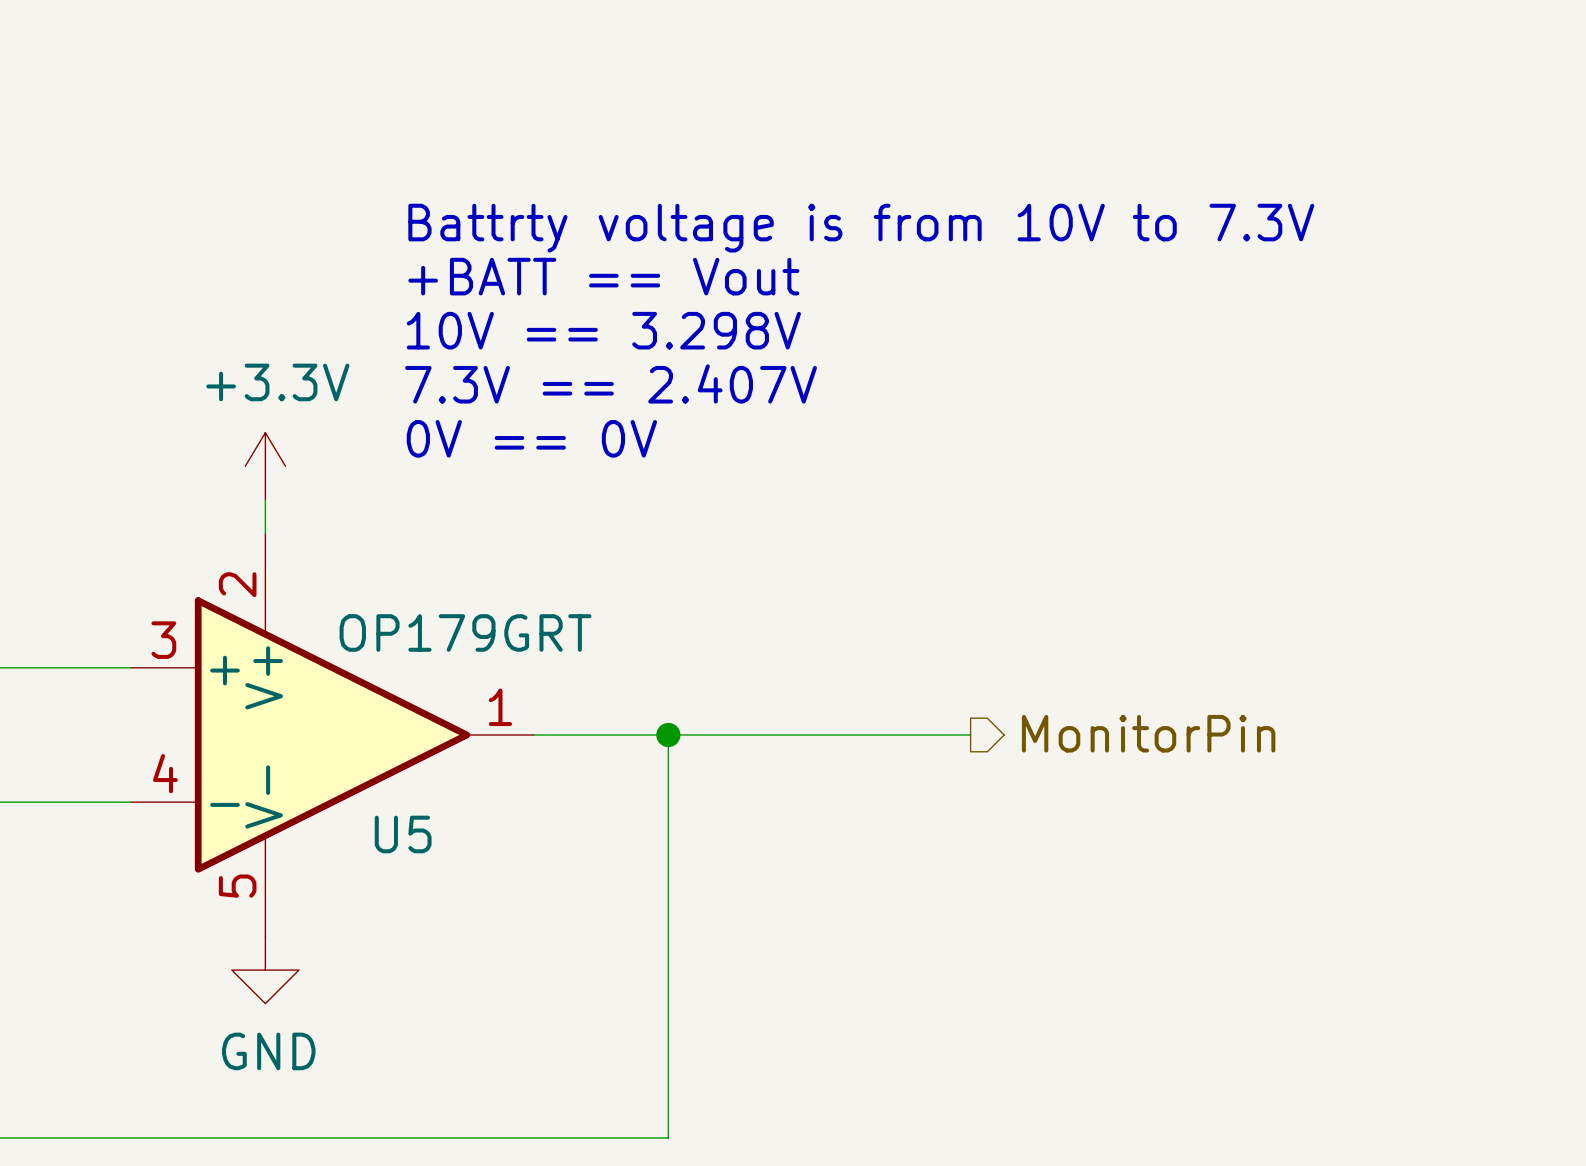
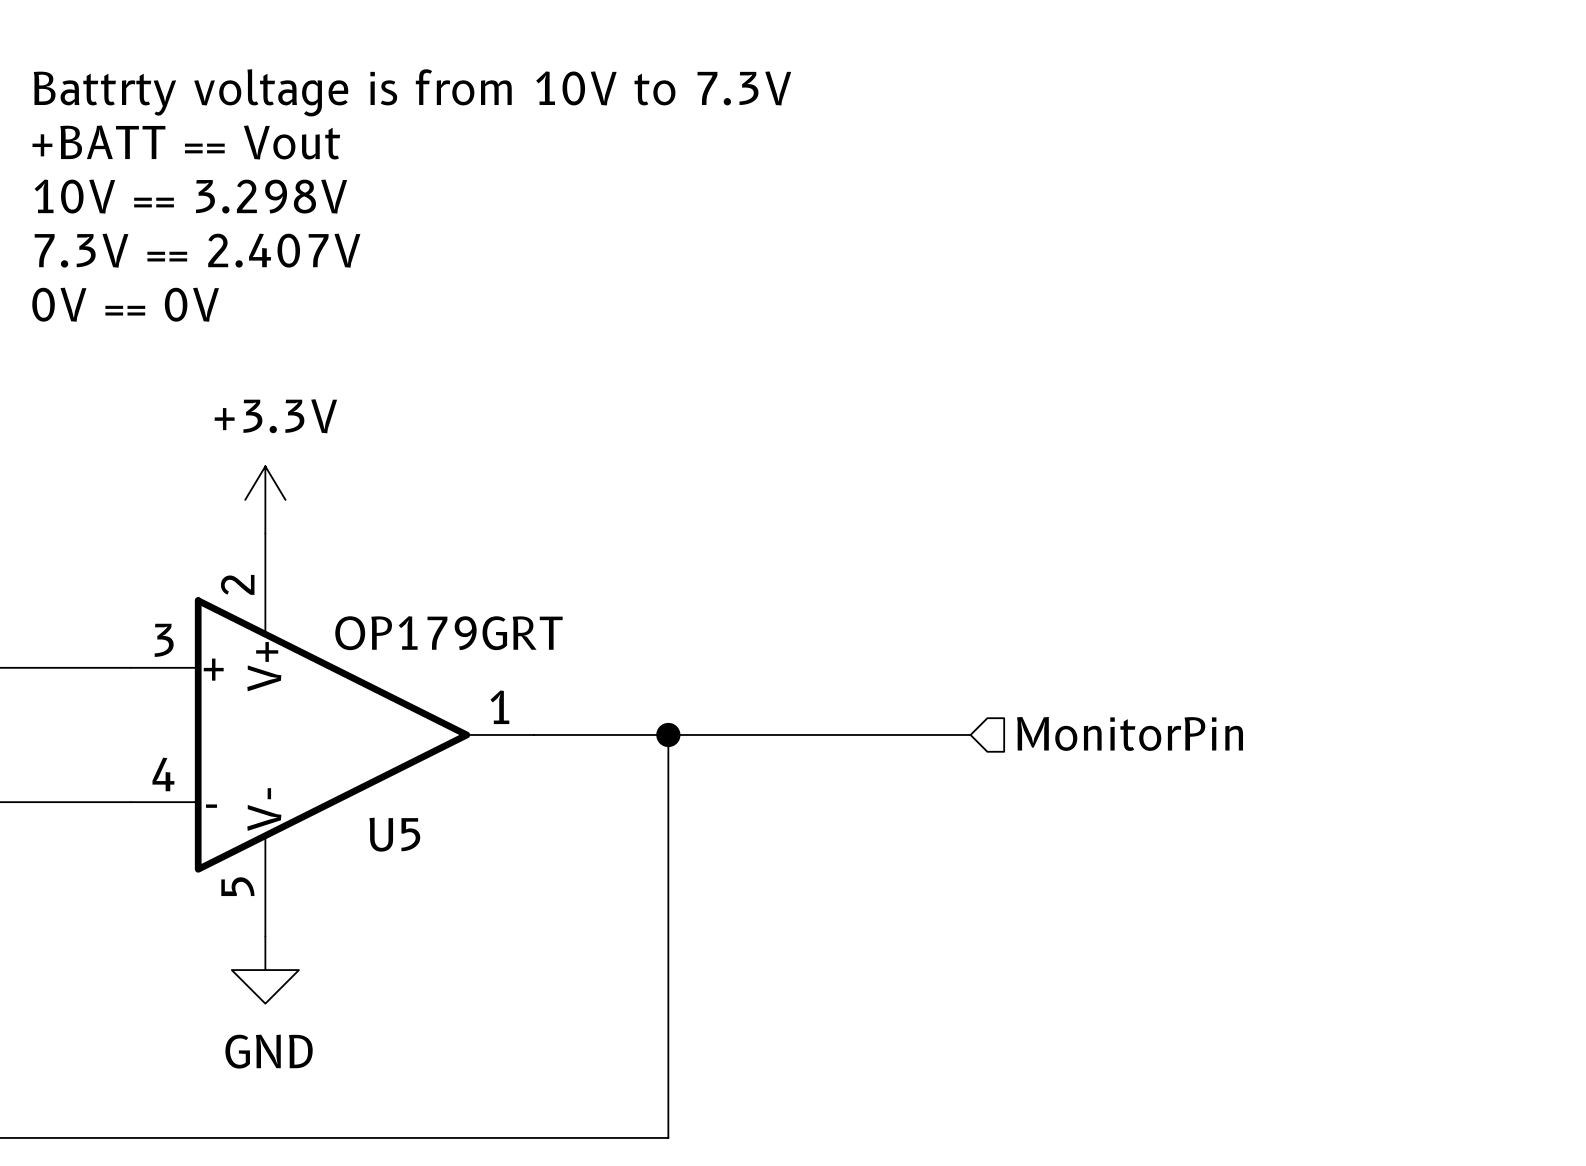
text position: Battrty voltage is from 10V to 7.3V (861, 228) -> Battrty voltage is from 10V to 7.3V (412, 92)
text position: +BATT == Vout (603, 276) -> +BATT == Vout (186, 142)
text position: 10V == 3.298V (603, 330) -> 10V == 3.298V (190, 196)
text position: 7.3V == 2.407V (611, 383) -> 7.3V == 2.407V (197, 250)
text position: 0V == 0V (531, 438) -> 0V == 0V (125, 304)
power symbol position: +3.3V (265, 466) -> +3.3V (265, 499)
hierarchical label shape: output (1148, 733) -> input (1130, 733)

